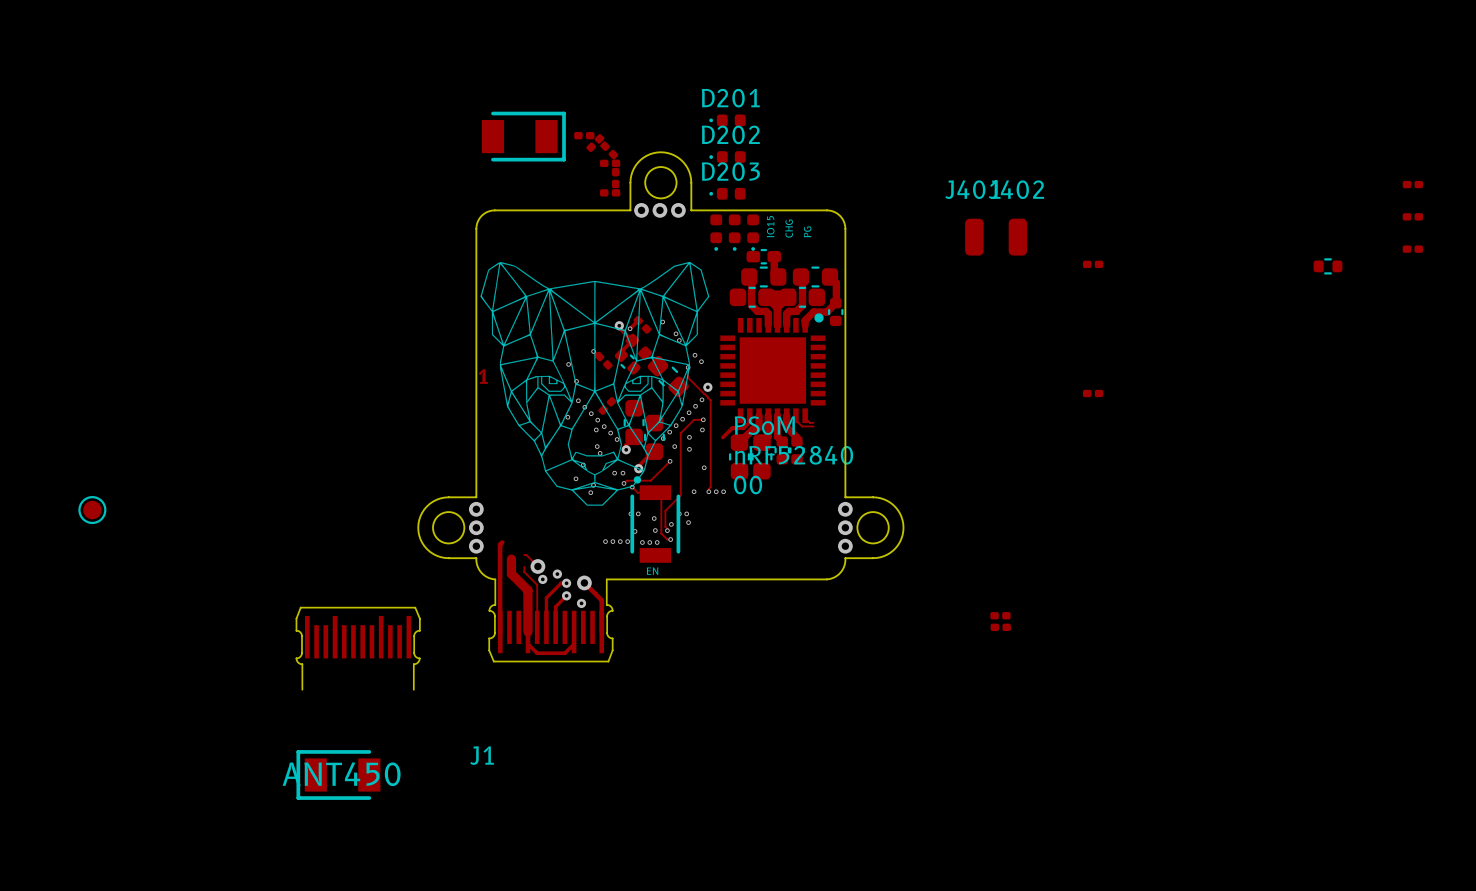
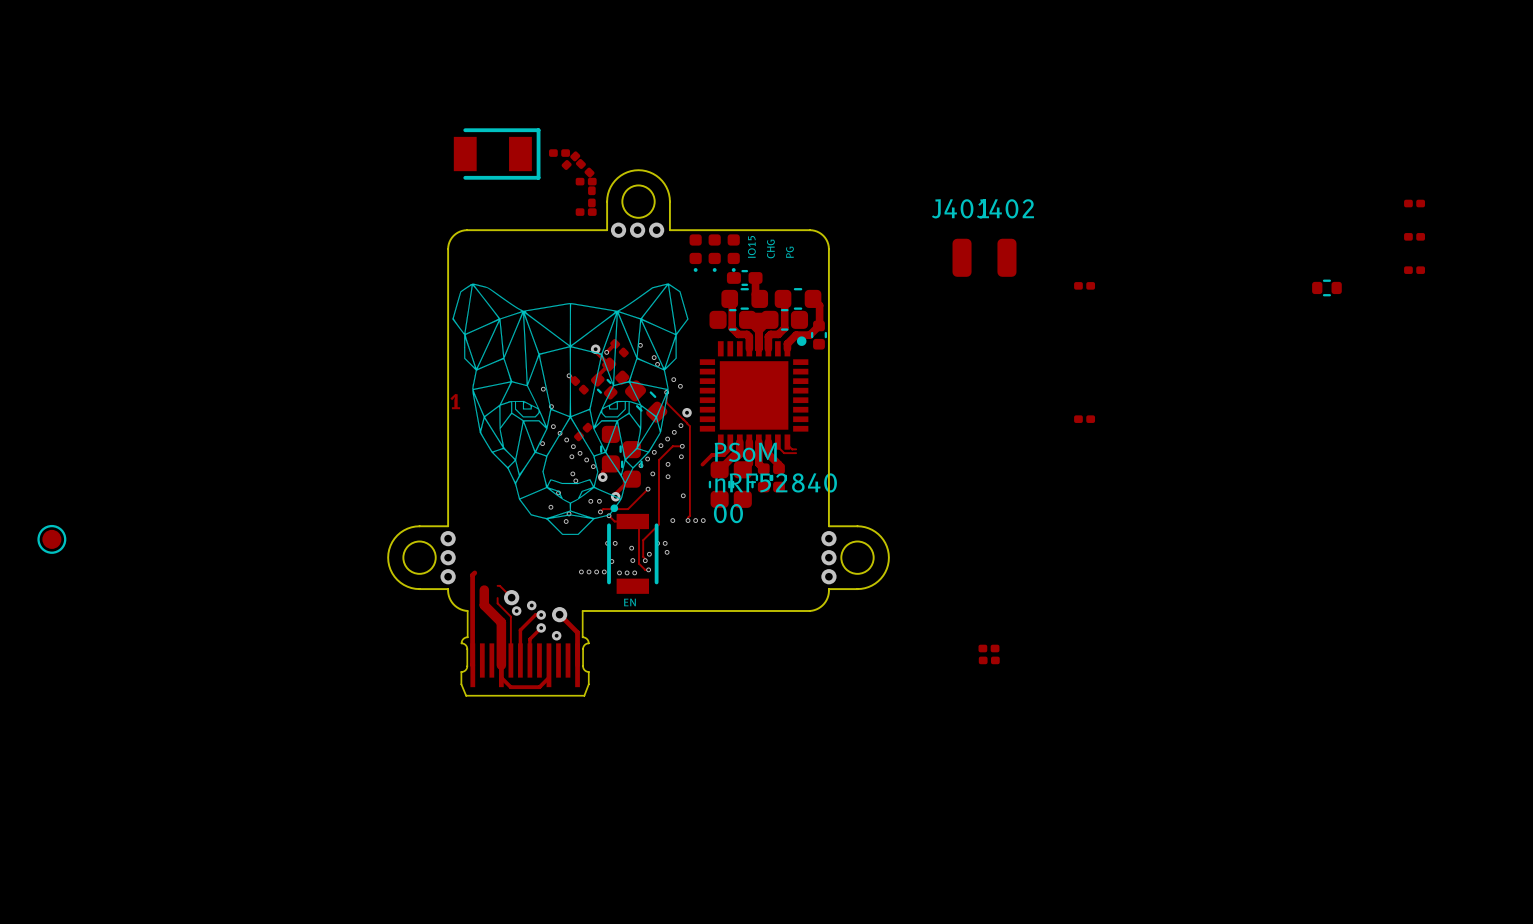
D201: (727, 120) -> none
D202: (727, 157) -> none
D203: (727, 193) -> none
J1: (358, 648) -> none
ANT450: (338, 774) -> none

